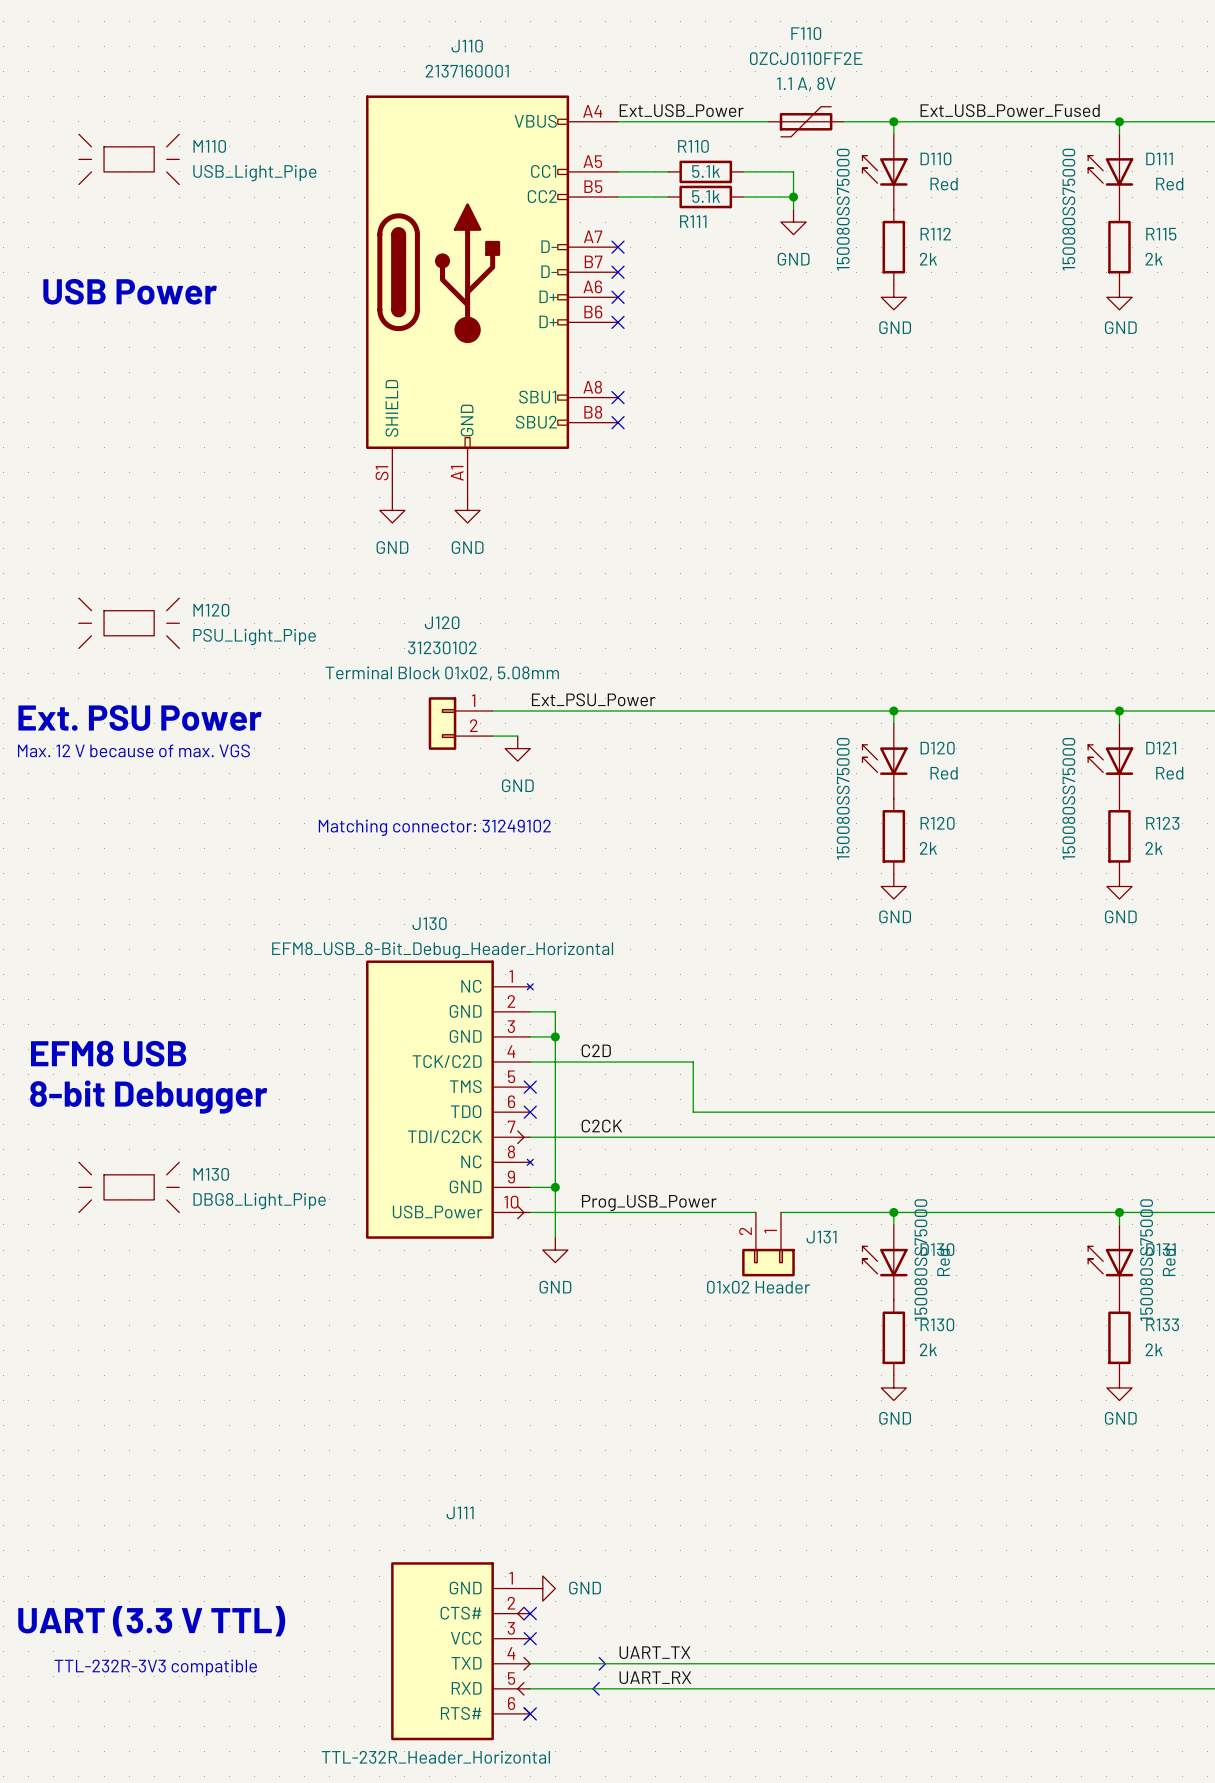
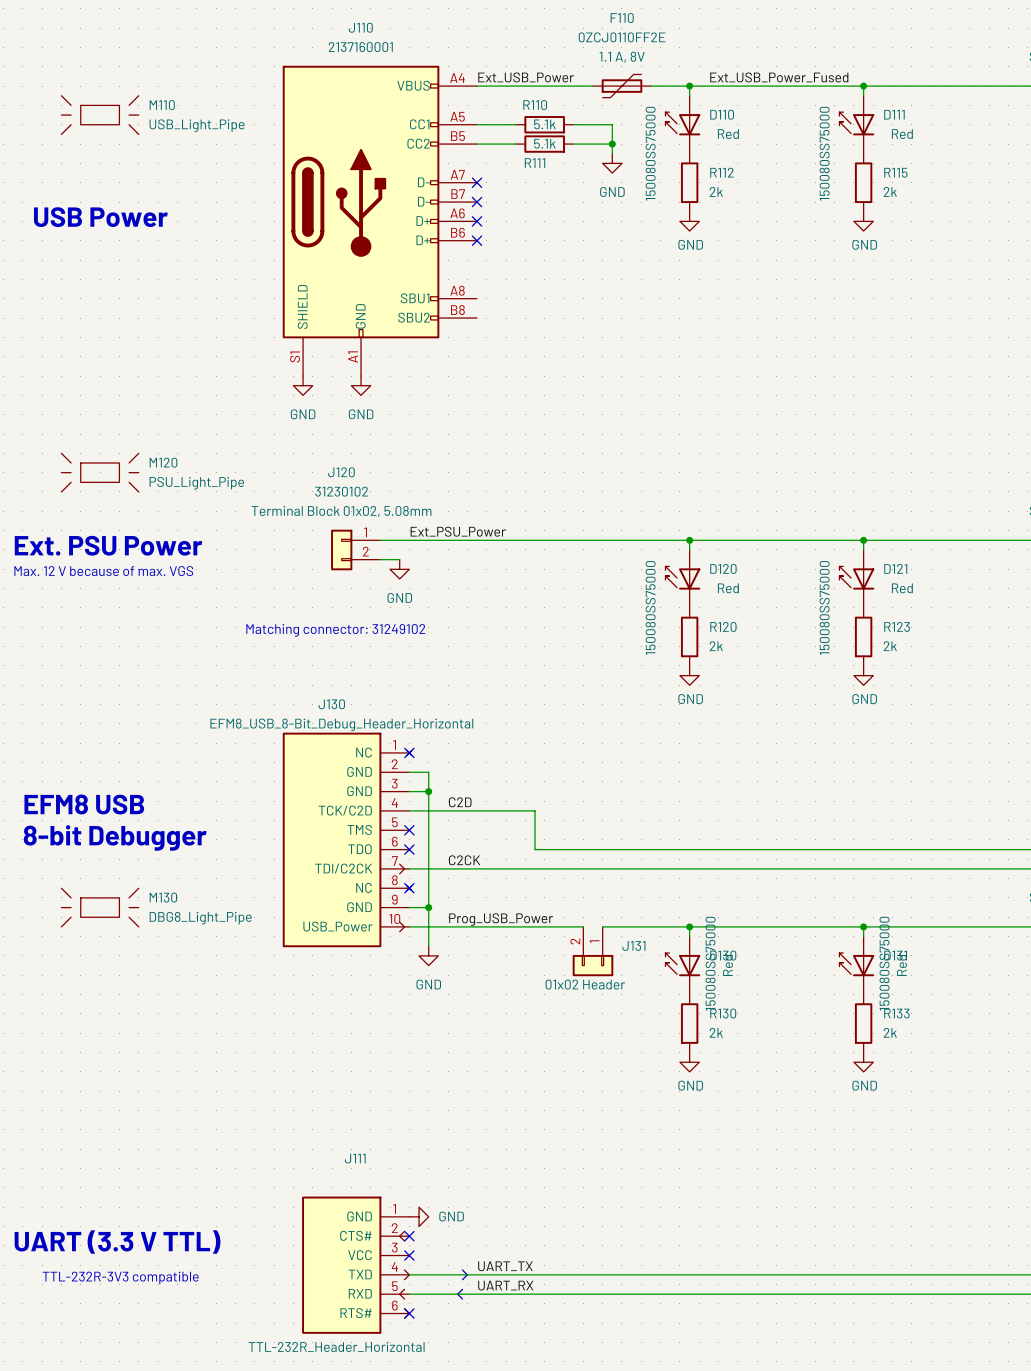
no-connect mark: (618, 397) -> none
no-connect mark: (618, 422) -> none
no-connect mark: none -> (409, 752)
no-connect mark: none -> (409, 888)

